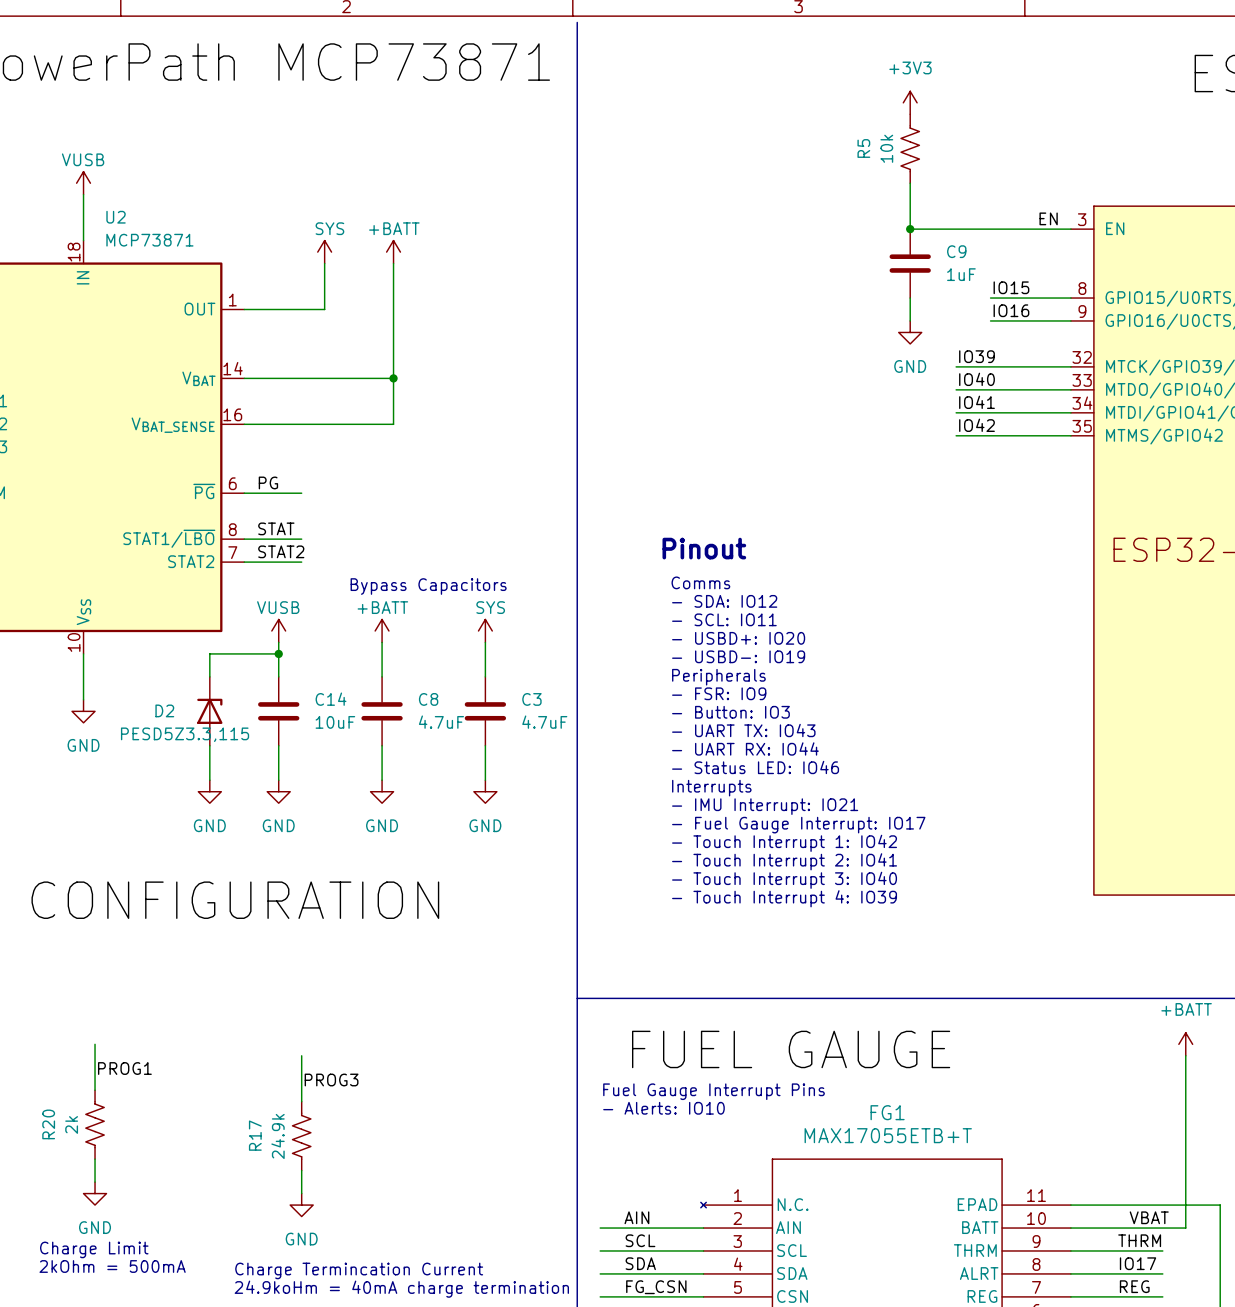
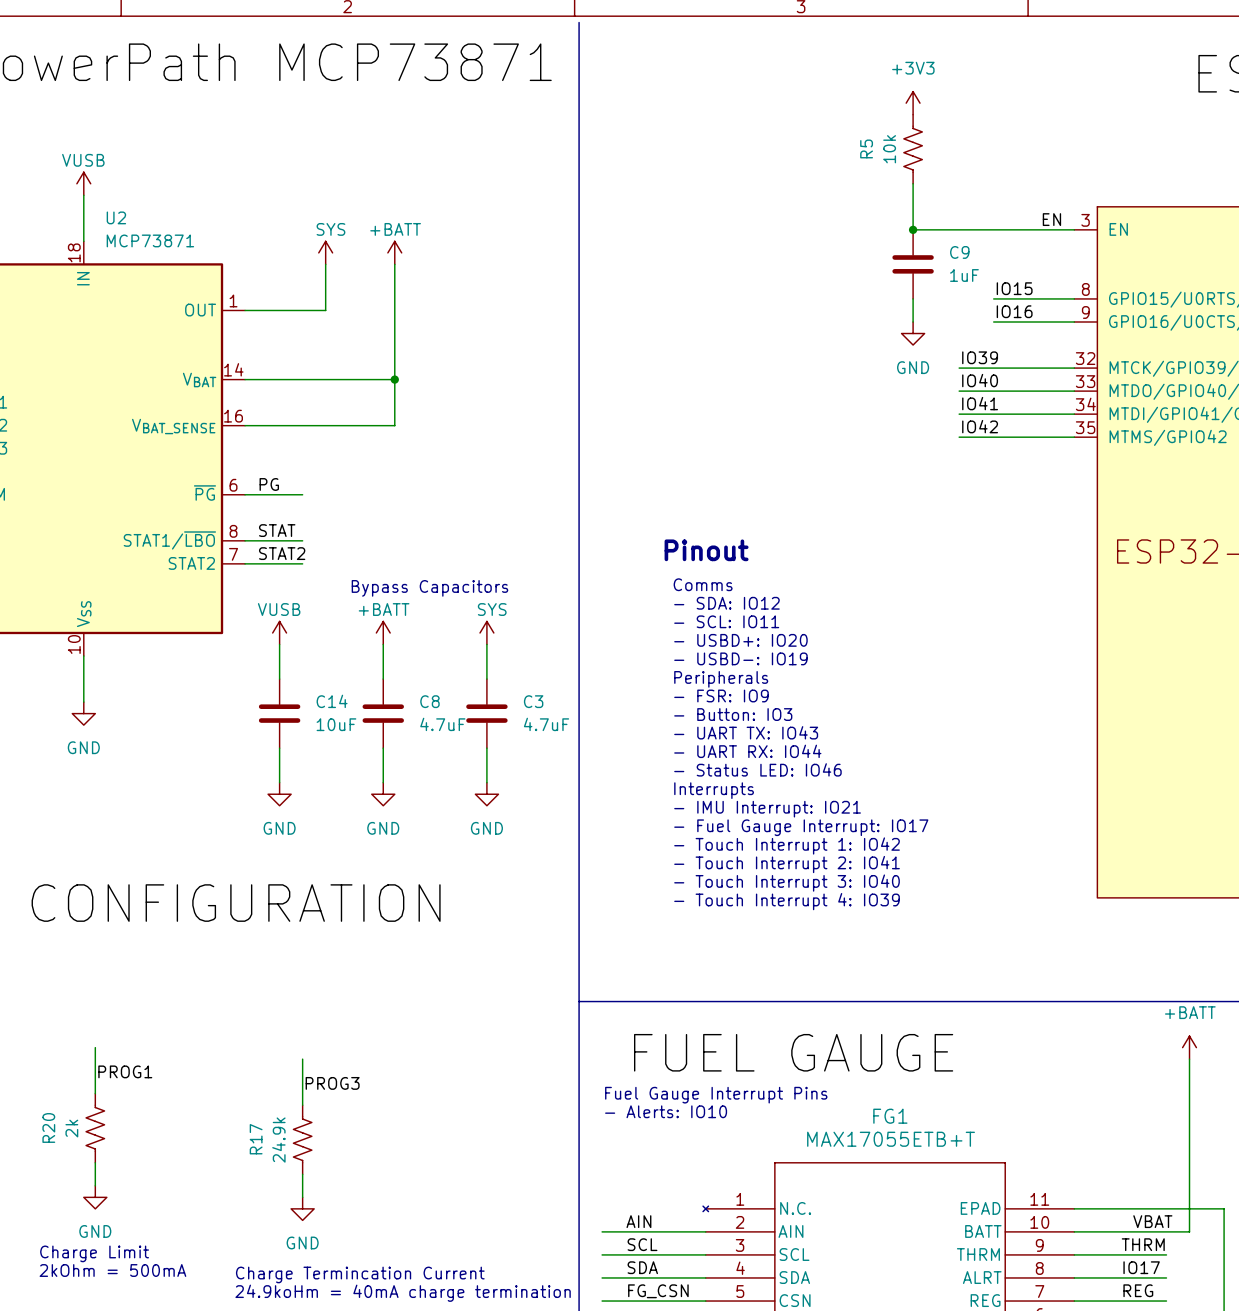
wire: (278, 653) (209, 653) (209, 676) -> none
junction: (278, 653) -> none
D2: PESD5Z3.3,115 (209, 711) -> none
wire: (209, 745) (209, 780) -> none
power symbol: GND (209, 791) -> none

